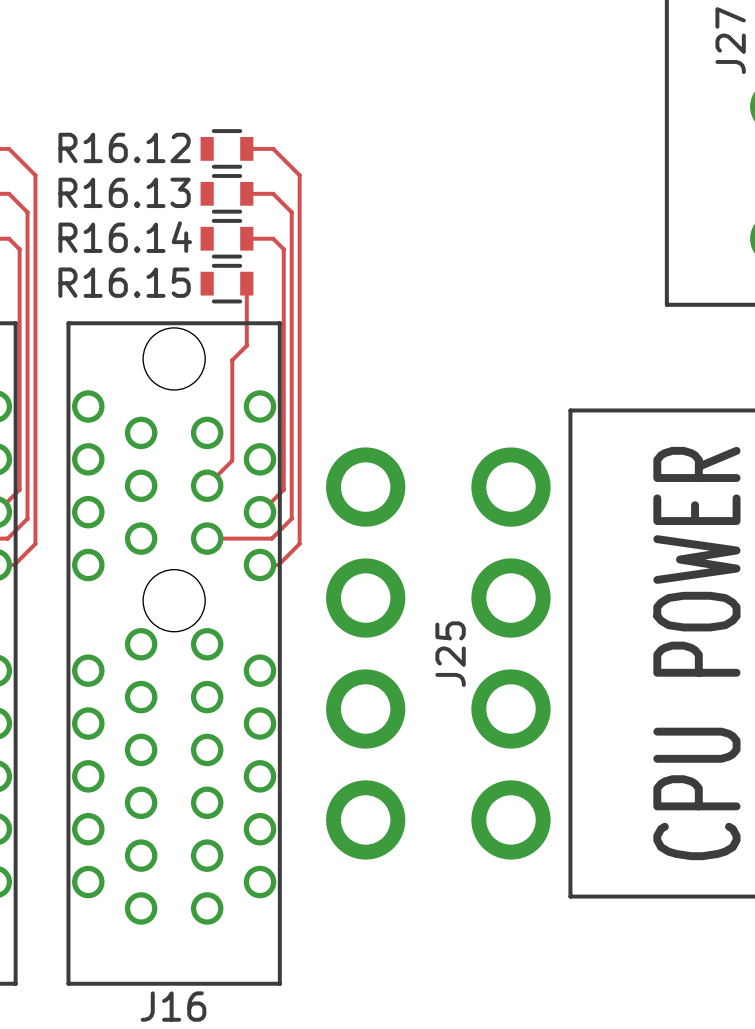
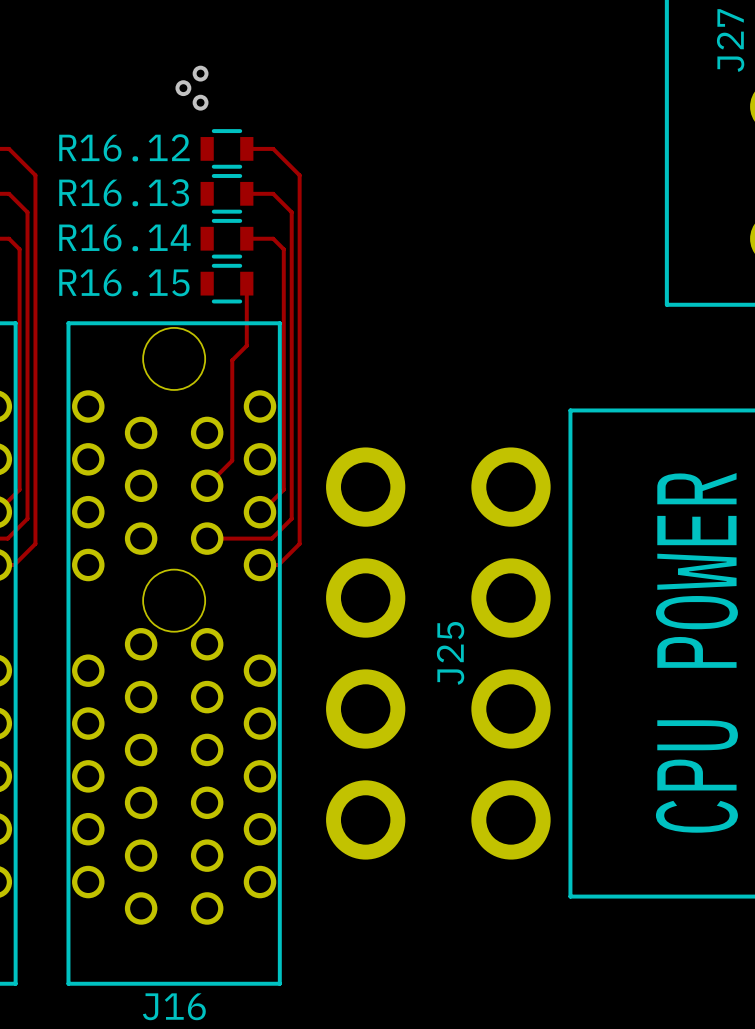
via: none -> (200, 73)
via: none -> (183, 88)
via: none -> (200, 102)

